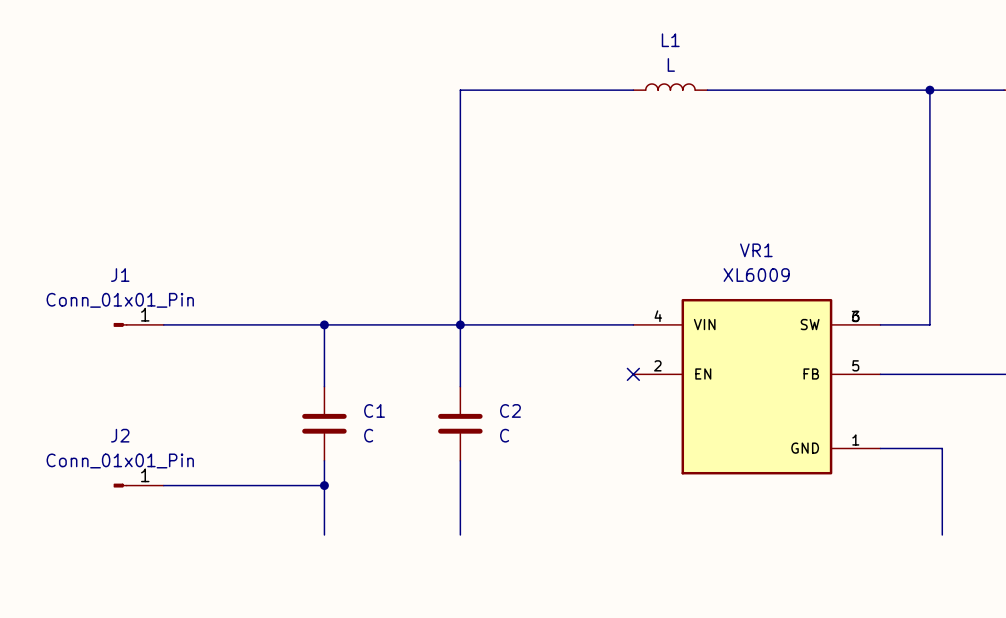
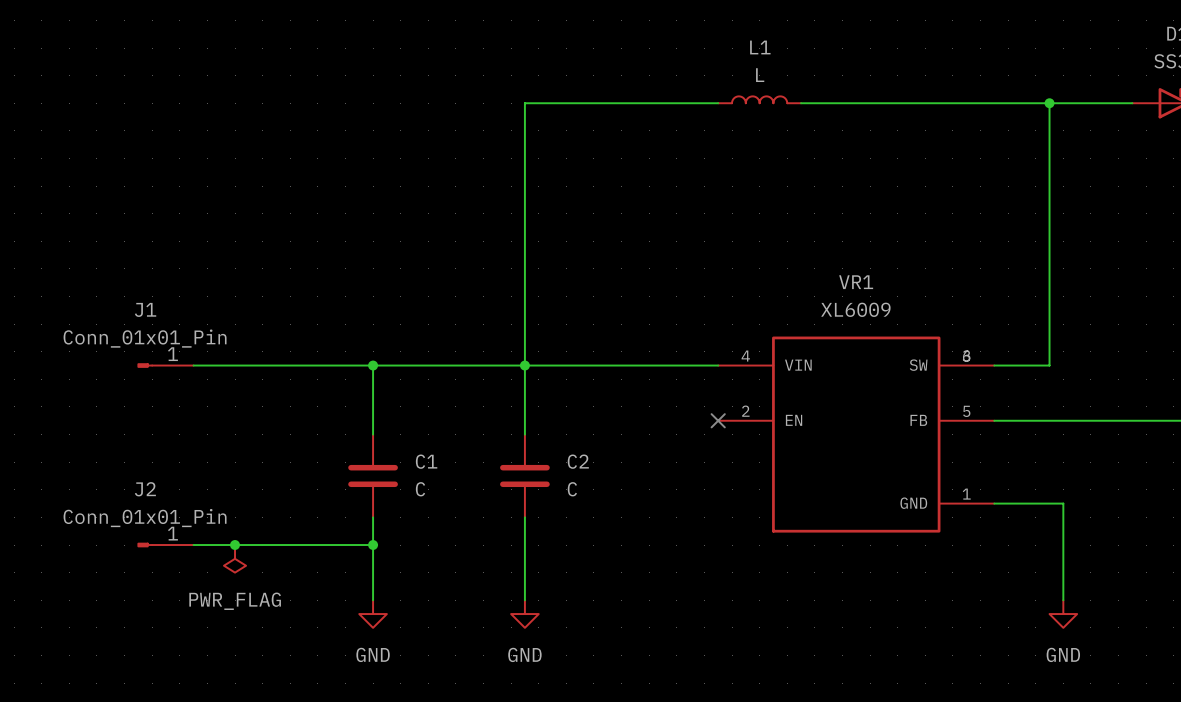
junction: none -> (235, 545)
power symbol: none -> PWR_FLAG (235, 558)
power symbol: none -> GND (373, 614)
power symbol: none -> GND (524, 614)
power symbol: none -> GND (1063, 614)

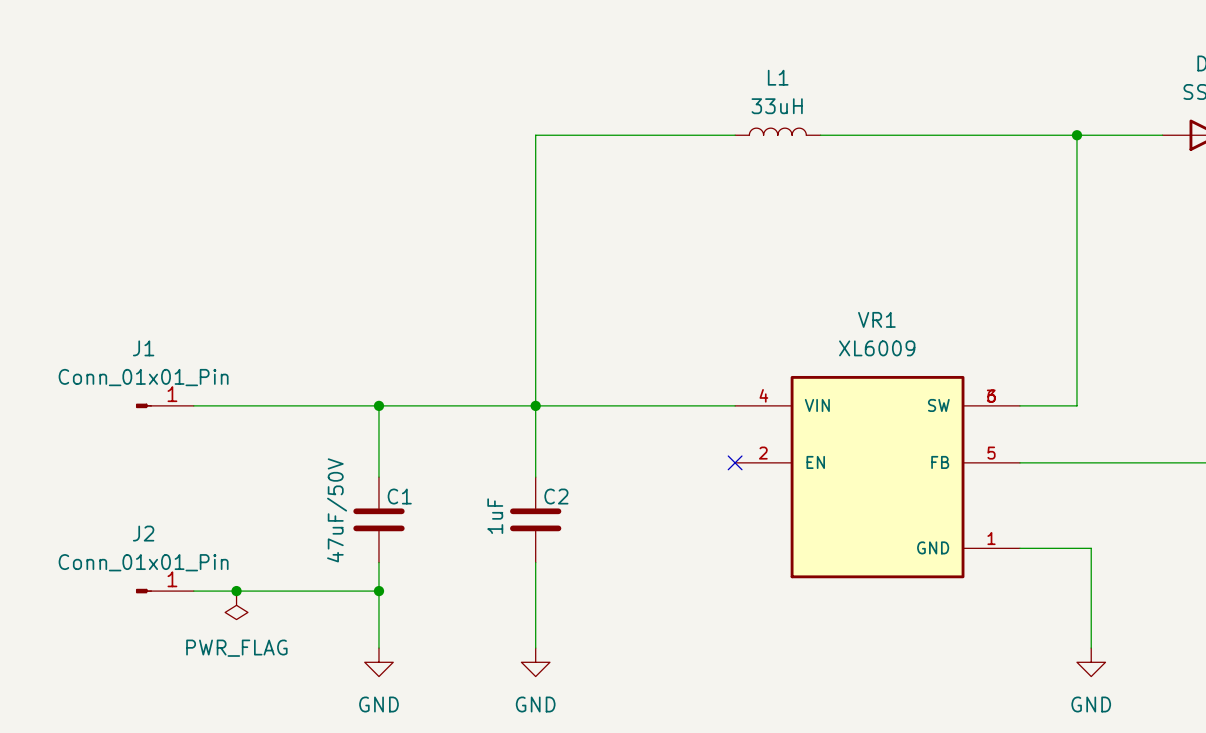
L1 value: L (760, 75) -> 33uH (777, 106)
C1 name position: C1 (426, 461) -> C1 (399, 496)
C2 name position: C2 (578, 461) -> C2 (556, 496)
C1 value: C (420, 489) -> 47uF/50V (337, 510)
C2 value: C (572, 489) -> 1uF (495, 516)

